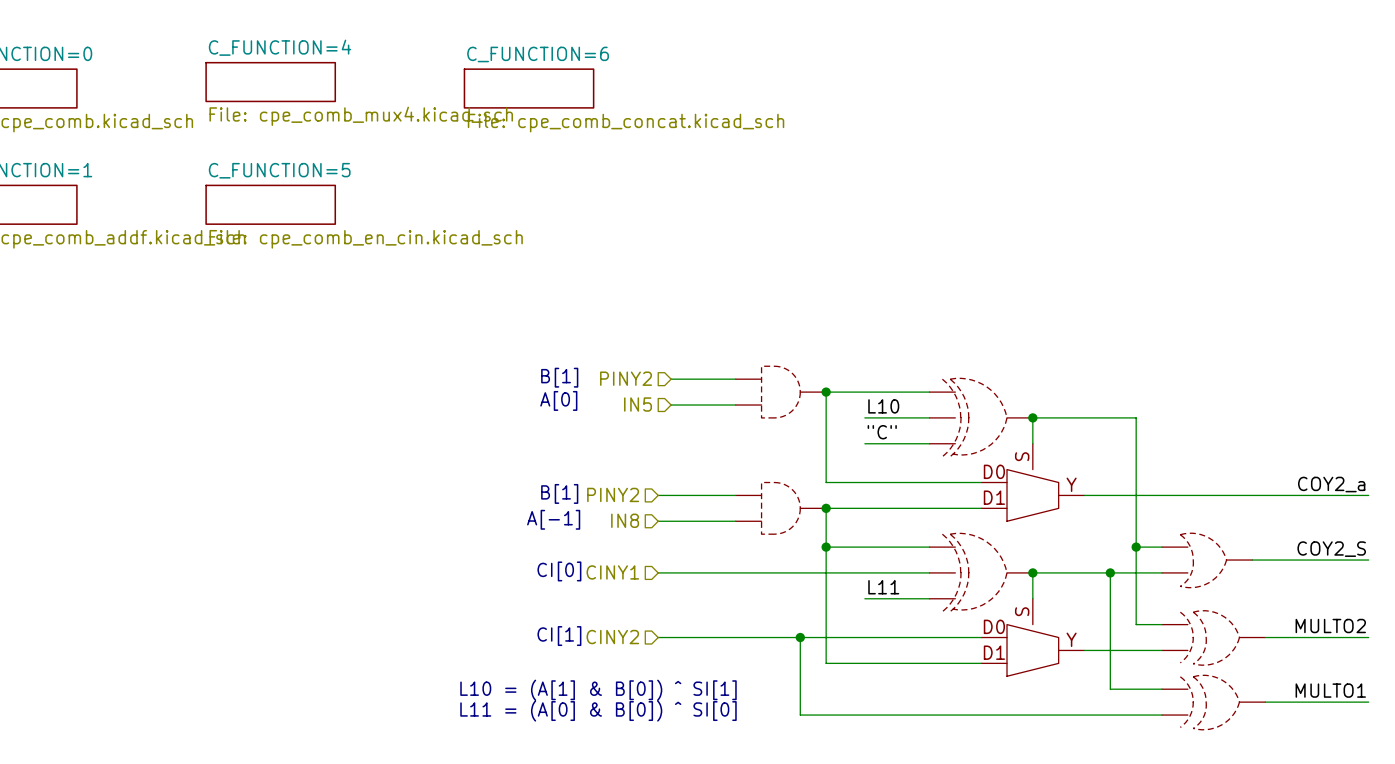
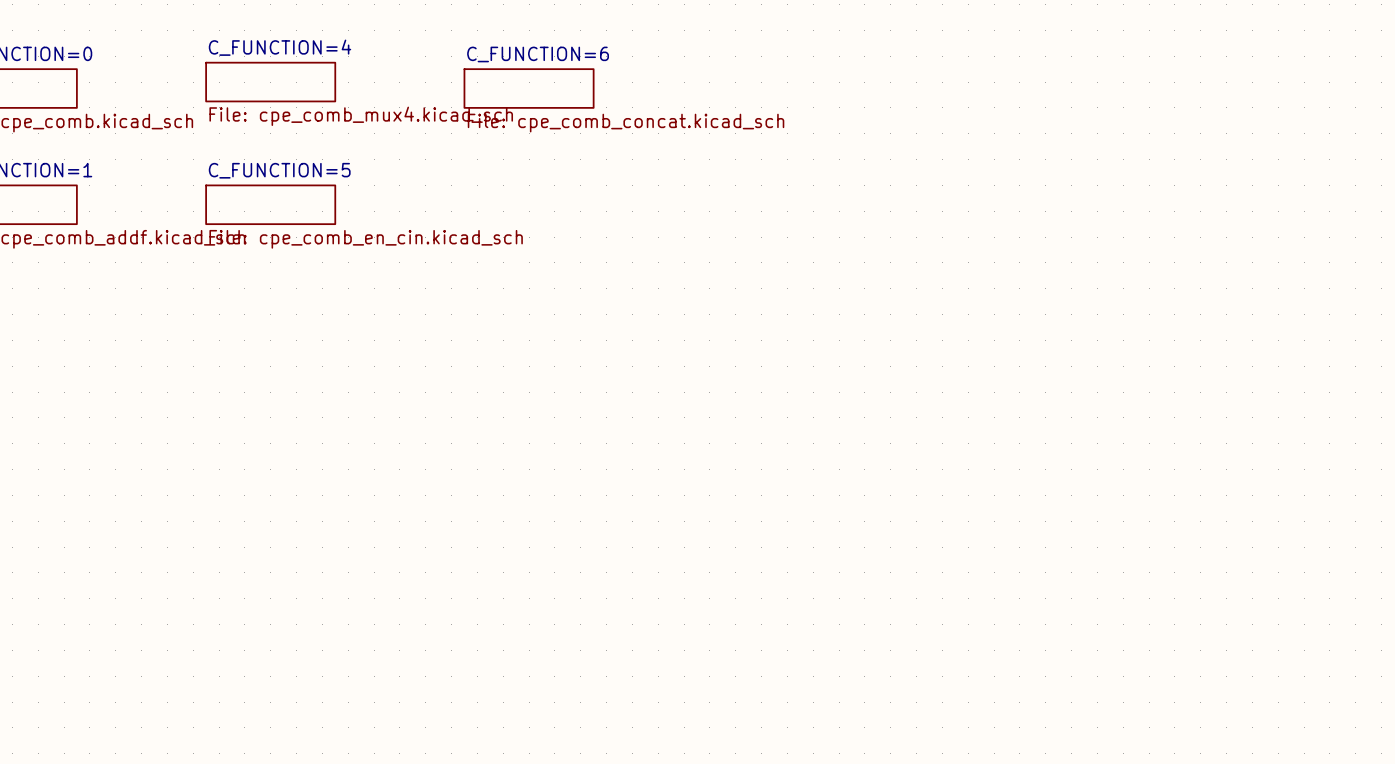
text: B[1] (559, 377) -> none
hierarchical label: PINY2 (626, 378) -> none
wire: (671, 379) (735, 379) -> none
part: (780, 392) -> none
junction: (826, 392) -> none
wire: (929, 392) (826, 392) (826, 482) (981, 482) -> none
text: A[0] (558, 400) -> none
hierarchical label: IN5 (638, 404) -> none
wire: (671, 405) (735, 405) -> none
label: L10 (883, 406) -> none
wire: (864, 417) (929, 417) -> none
part: (981, 417) -> none
junction: (1032, 417) -> none
label: "C" (882, 432) -> none
wire: (864, 443) (929, 443) -> none
wire: (1032, 443) (1032, 417) (1136, 417) (1136, 624) (1162, 624) -> none
part: (1032, 482) -> none
label: COY2_a (1331, 484) -> none
text: B[1] (559, 493) -> none
hierarchical label: PINY2 (613, 494) -> none
wire: (658, 495) (735, 495) -> none
wire: (1084, 495) (1368, 495) -> none
part: (780, 508) -> none
junction: (826, 508) -> none
wire: (981, 508) (826, 508) (826, 663) (981, 663) -> none
text: A[-1] (553, 519) -> none
hierarchical label: IN8 (625, 520) -> none
wire: (658, 521) (735, 521) -> none
wire: (826, 547) (929, 547) -> none
junction: (826, 547) -> none
wire: (1136, 547) (1162, 547) -> none
junction: (1136, 547) -> none
label: COY2_S (1331, 549) -> none
part: (1207, 560) -> none
wire: (1252, 560) (1368, 560) -> none
text: CI[0] (559, 571) -> none
hierarchical label: CINY1 (612, 572) -> none
wire: (658, 572) (929, 572) -> none
part: (981, 572) -> none
junction: (1032, 572) -> none
wire: (1110, 572) (1110, 689) (1162, 689) -> none
junction: (1110, 572) -> none
wire: (1162, 572) (1032, 572) (1032, 598) -> none
label: L11 (883, 587) -> none
wire: (864, 598) (929, 598) -> none
label: MULTO2 (1330, 626) -> none
text: CI[1] (559, 636) -> none
hierarchical label: CINY2 (612, 637) -> none
wire: (658, 637) (981, 637) -> none
wire: (800, 637) (800, 715) (1162, 715) -> none
junction: (800, 637) -> none
part: (1032, 637) -> none
part: (1213, 637) -> none
wire: (1265, 637) (1368, 637) -> none
wire: (1084, 650) (1162, 650) -> none
text: L10 = (A[1] & B[0]) ^ SI[1] (598, 690) -> none
label: MULTO1 (1330, 690) -> none
part: (1213, 702) -> none
wire: (1265, 702) (1368, 702) -> none
text: L11 = (A[0] & B[0]) ^ SI[0] (598, 711) -> none

